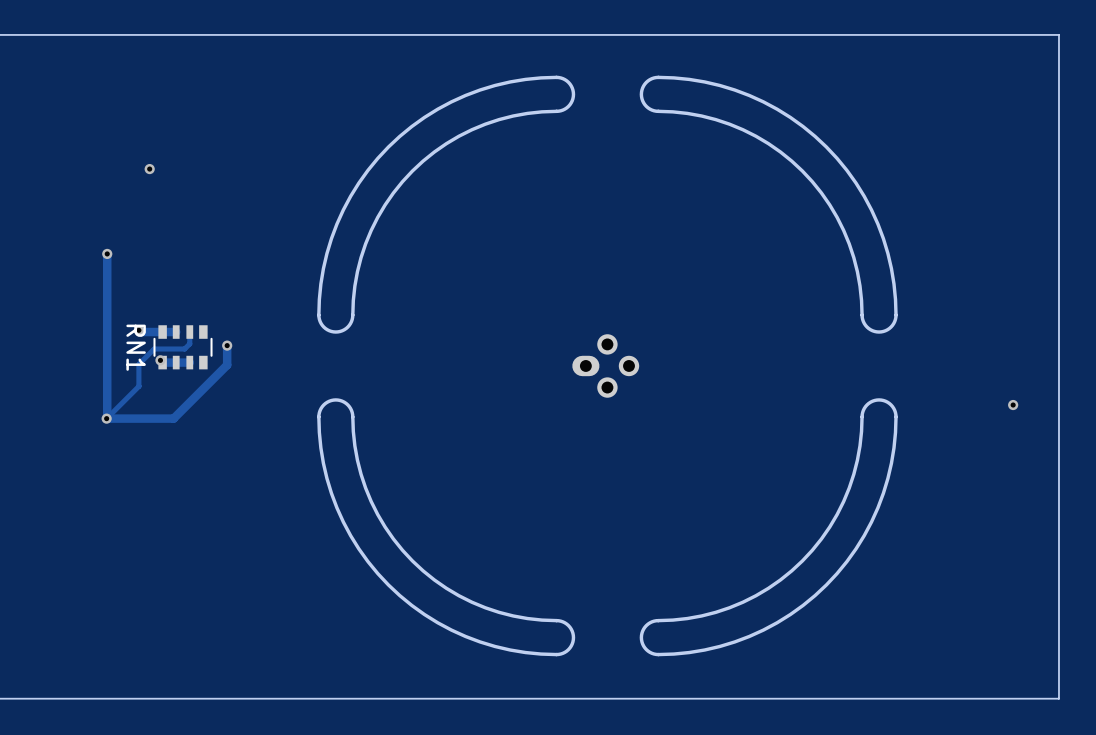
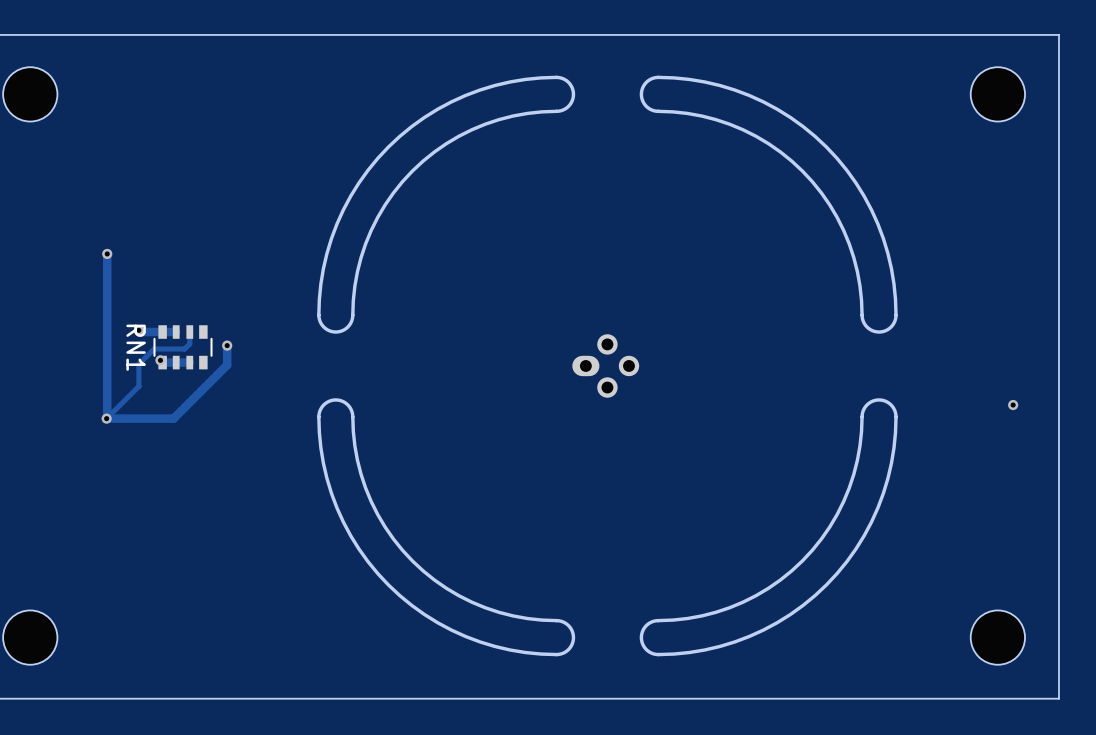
part: none -> (30, 94)
part: none -> (997, 94)
via: (149, 169) -> none
part: none -> (30, 637)
part: none -> (997, 637)

